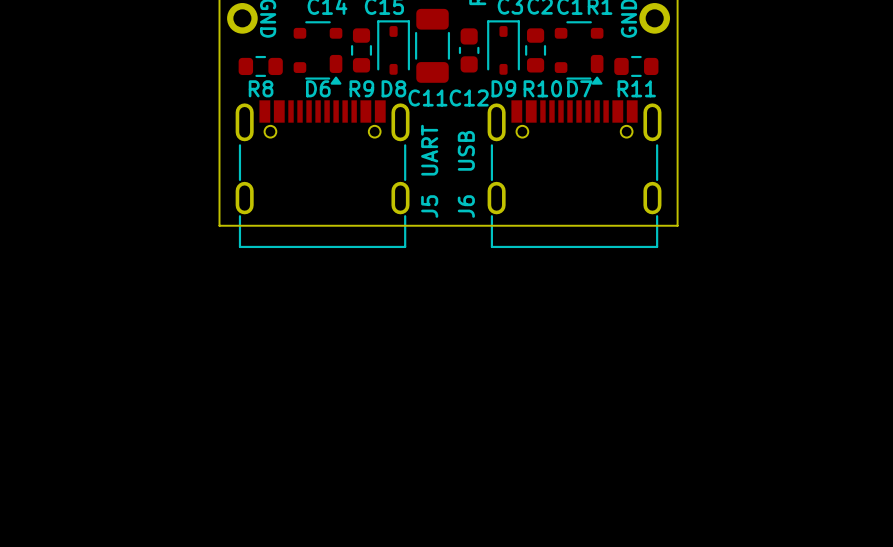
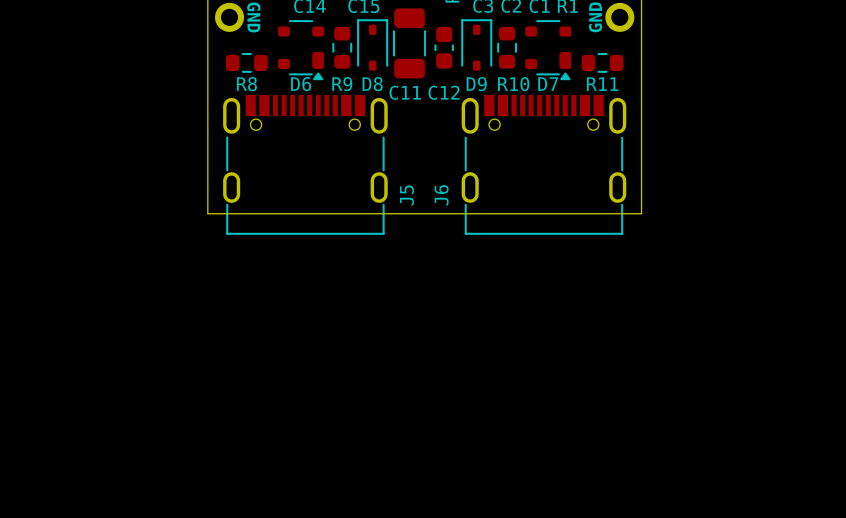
text: UART (429, 150) -> none
text: USB (466, 150) -> none

